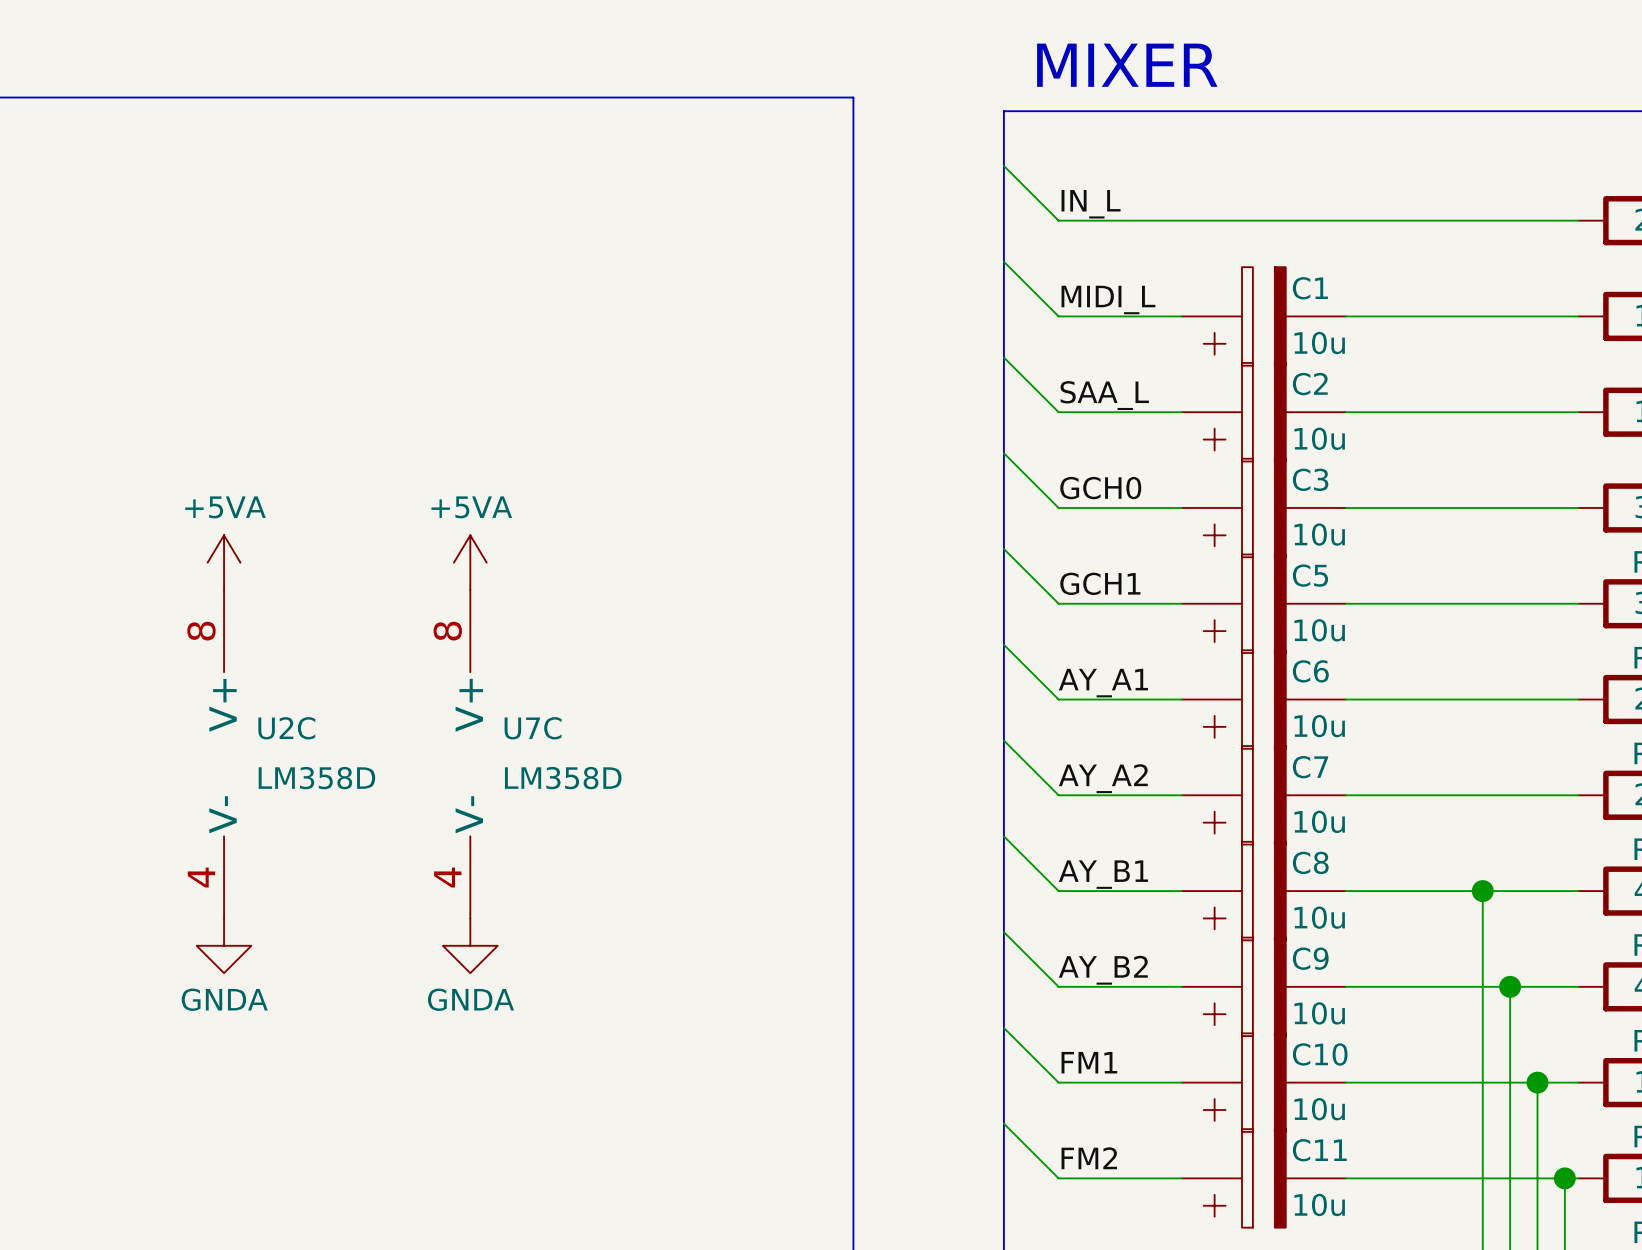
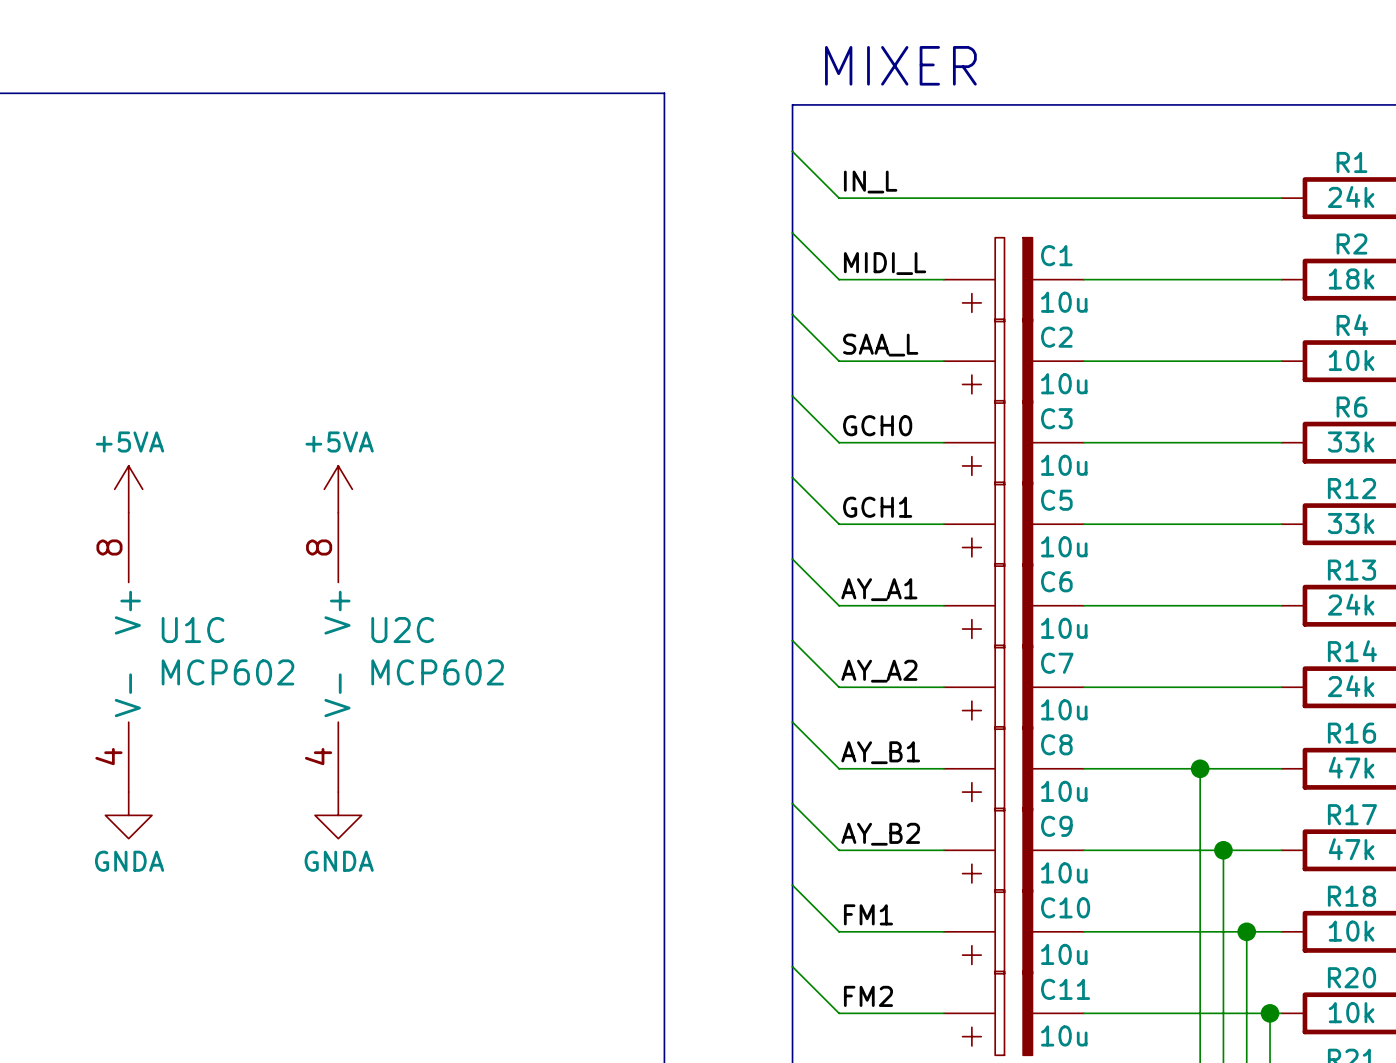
U2C name: U2C (286, 728) -> U1C (193, 630)
U7C name: U7C (533, 728) -> U2C (402, 630)
U2C value: LM358D (316, 778) -> MCP602 (227, 672)
U7C value: LM358D (563, 778) -> MCP602 (437, 672)

